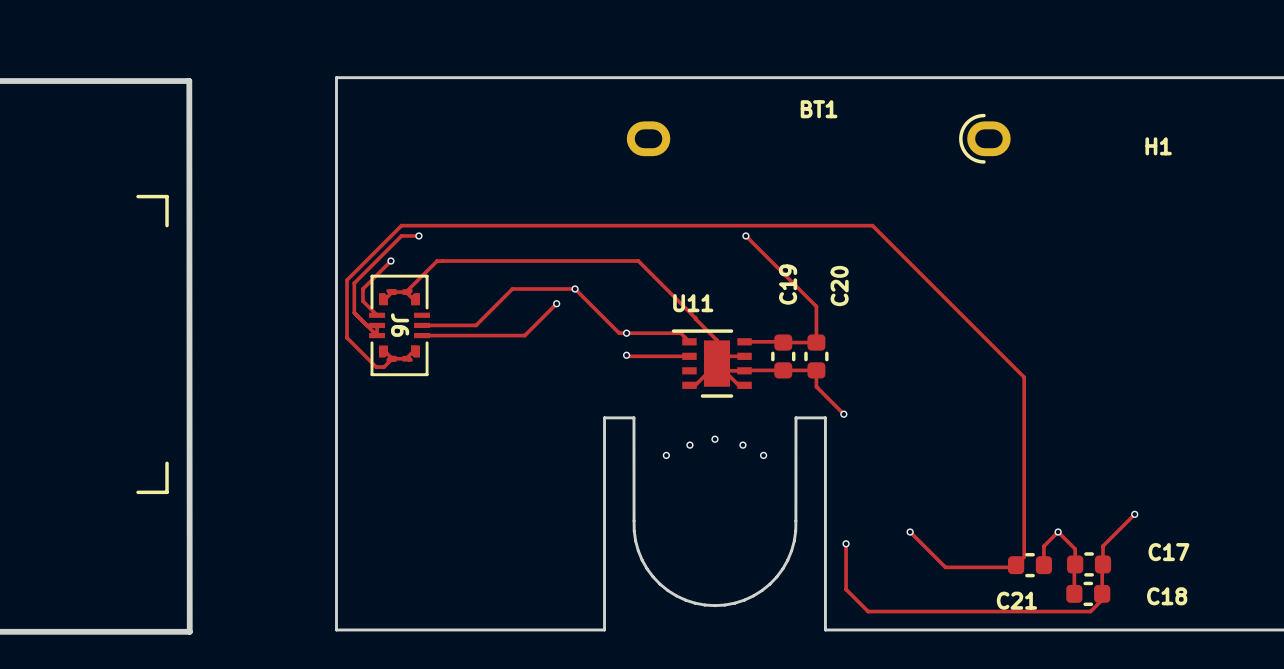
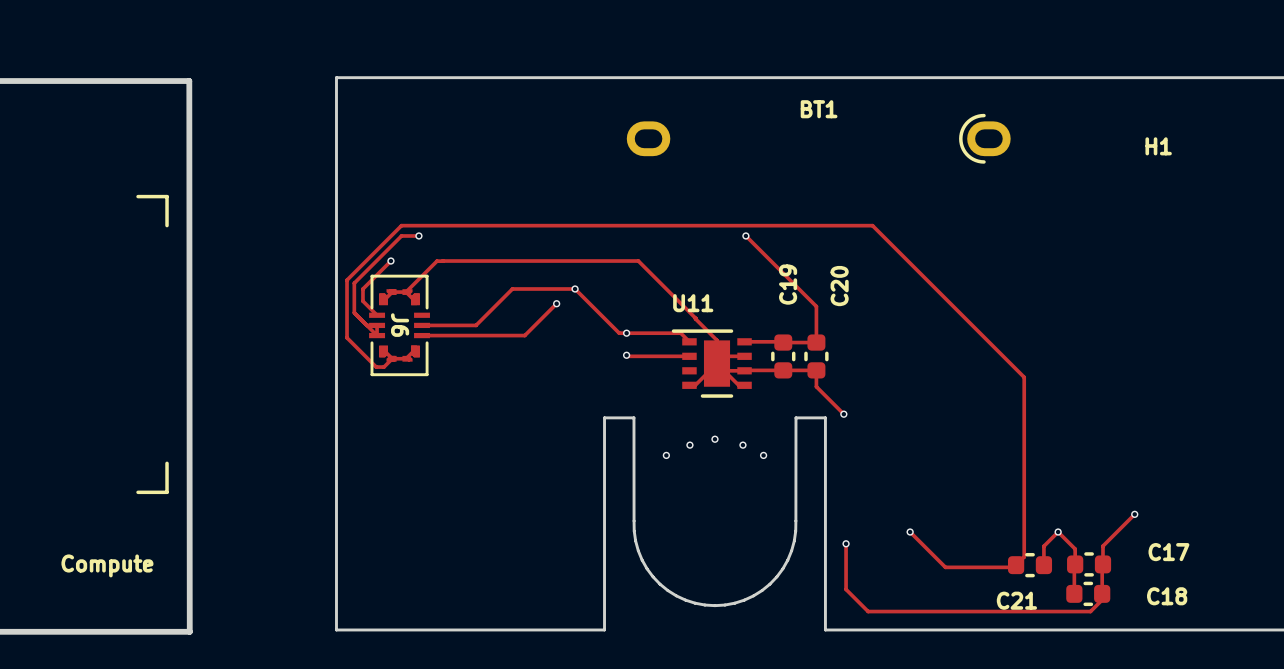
text: none -> Compute (107, 565)

